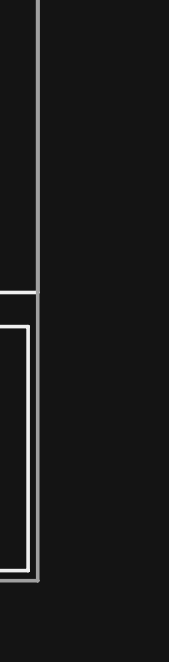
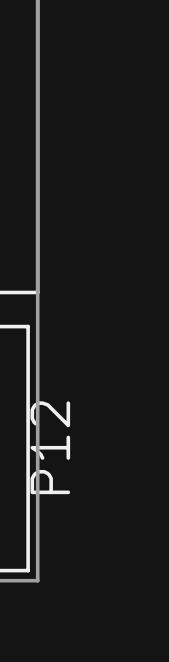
P12 name: none -> P12 (50, 447)

